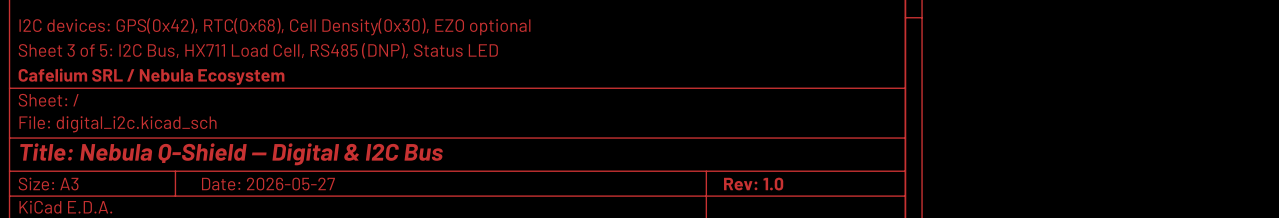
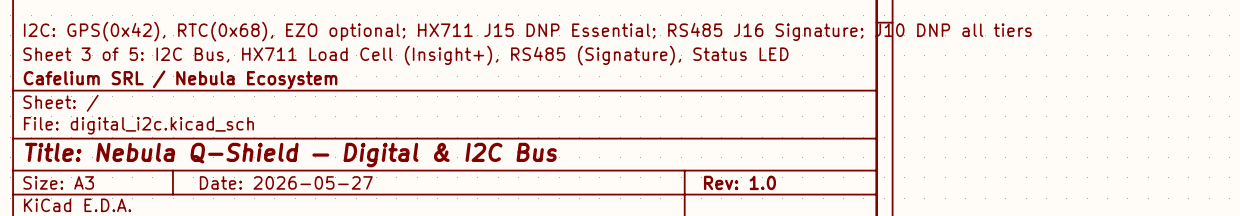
title block: I2C devices: GPS(0x42), RTC(0x68), Cell Density(0x30), EZO optional (274, 26) -> I2C: GPS(0x42), RTC(0x68), EZO optional; HX711 J15 DNP Essential; RS485 J16 Signature; J10 DNP all tiers (527, 31)
title block: Sheet 3 of 5: I2C Bus, HX711 Load Cell, RS485 (DNP), Status LED (258, 50) -> Sheet 3 of 5: I2C Bus, HX711 Load Cell (Insight+), RS485 (Signature), Status LED (405, 55)

